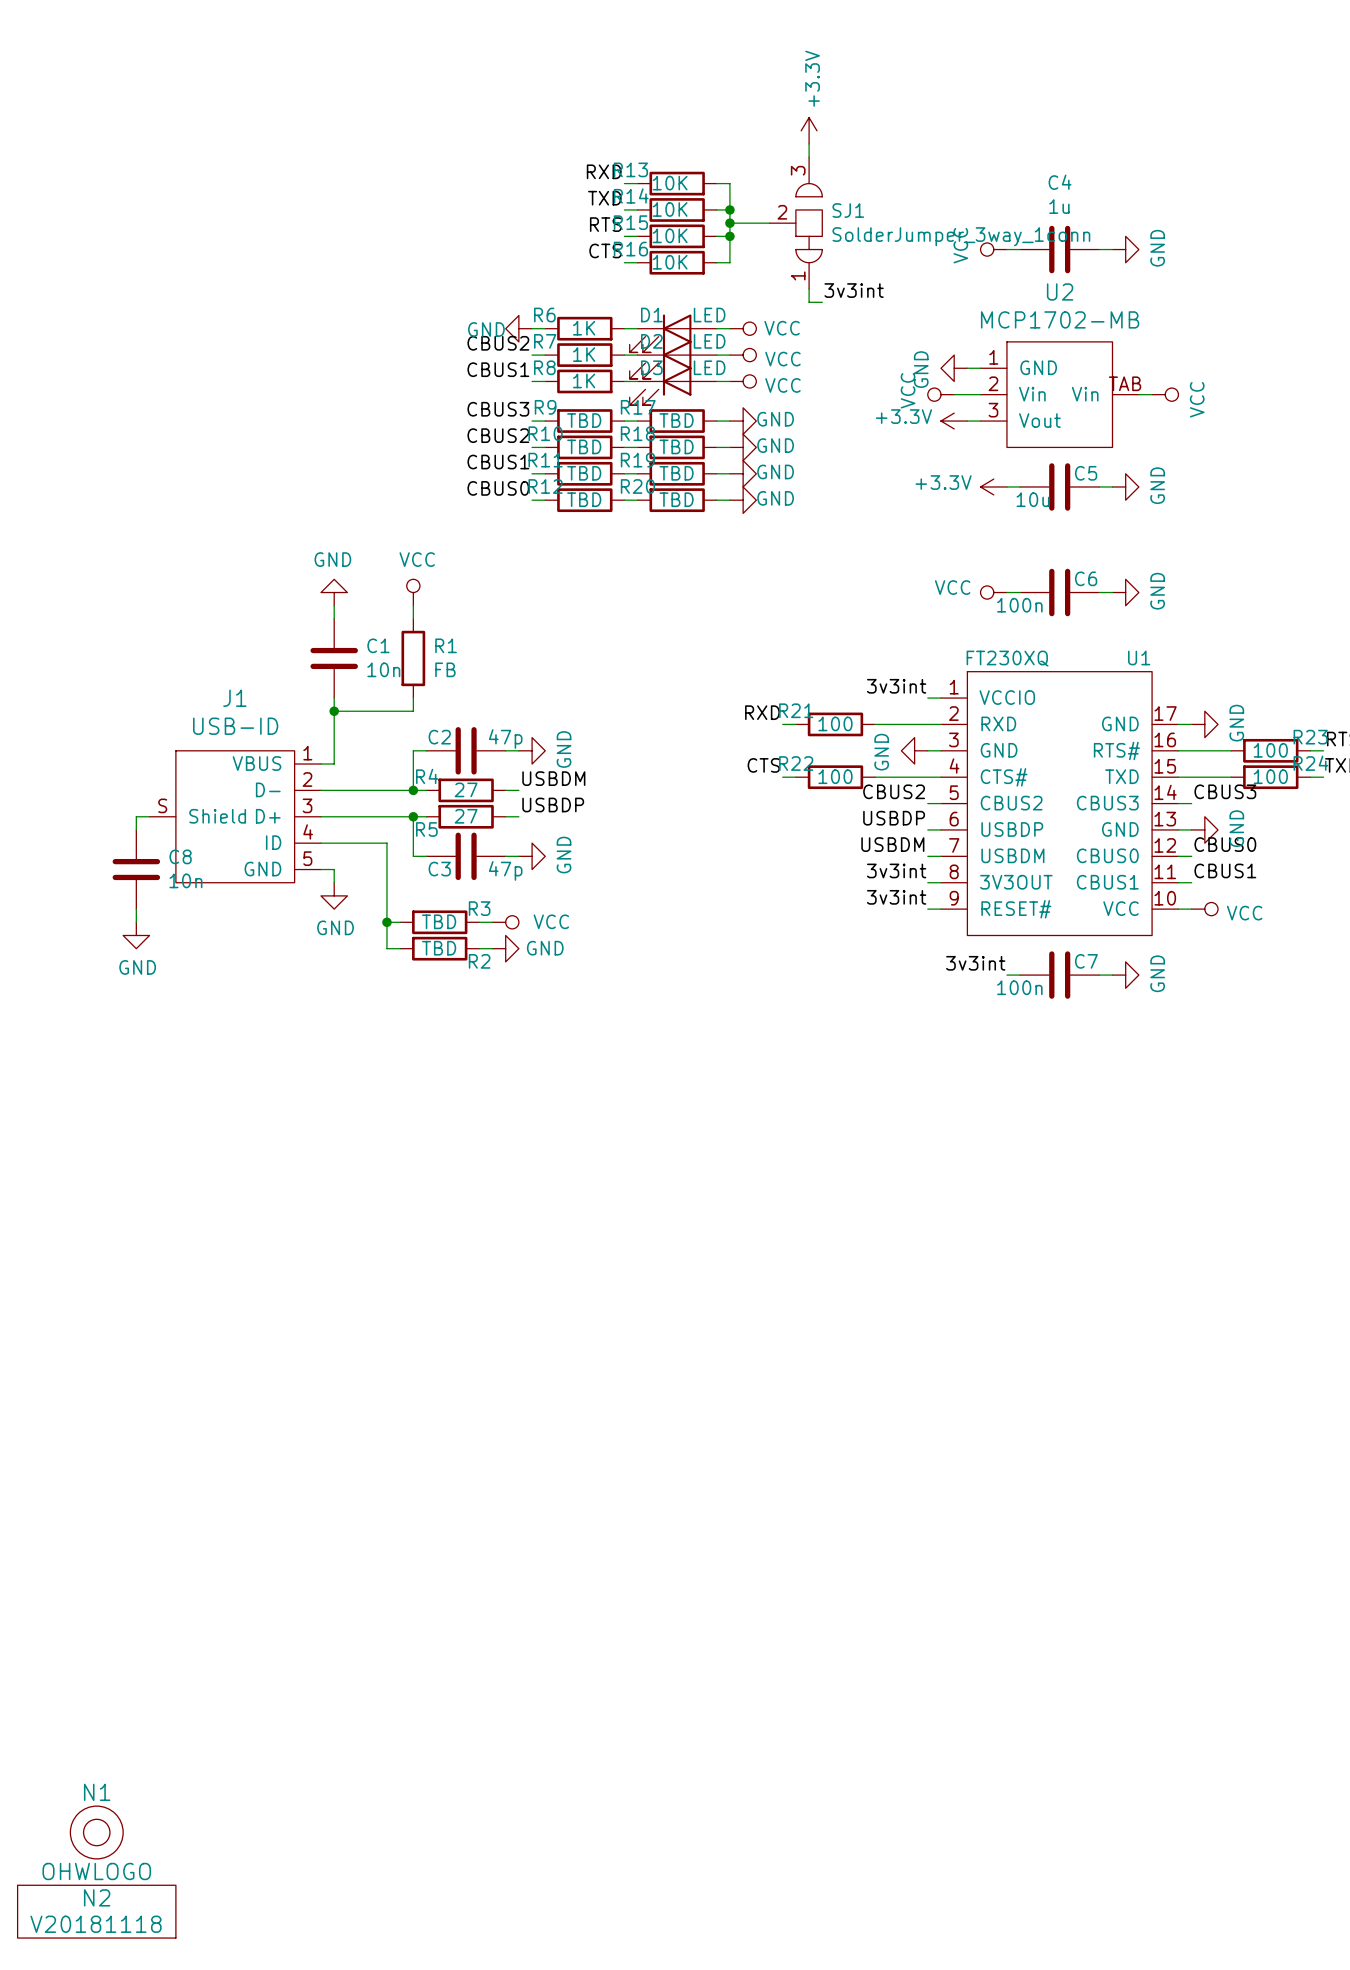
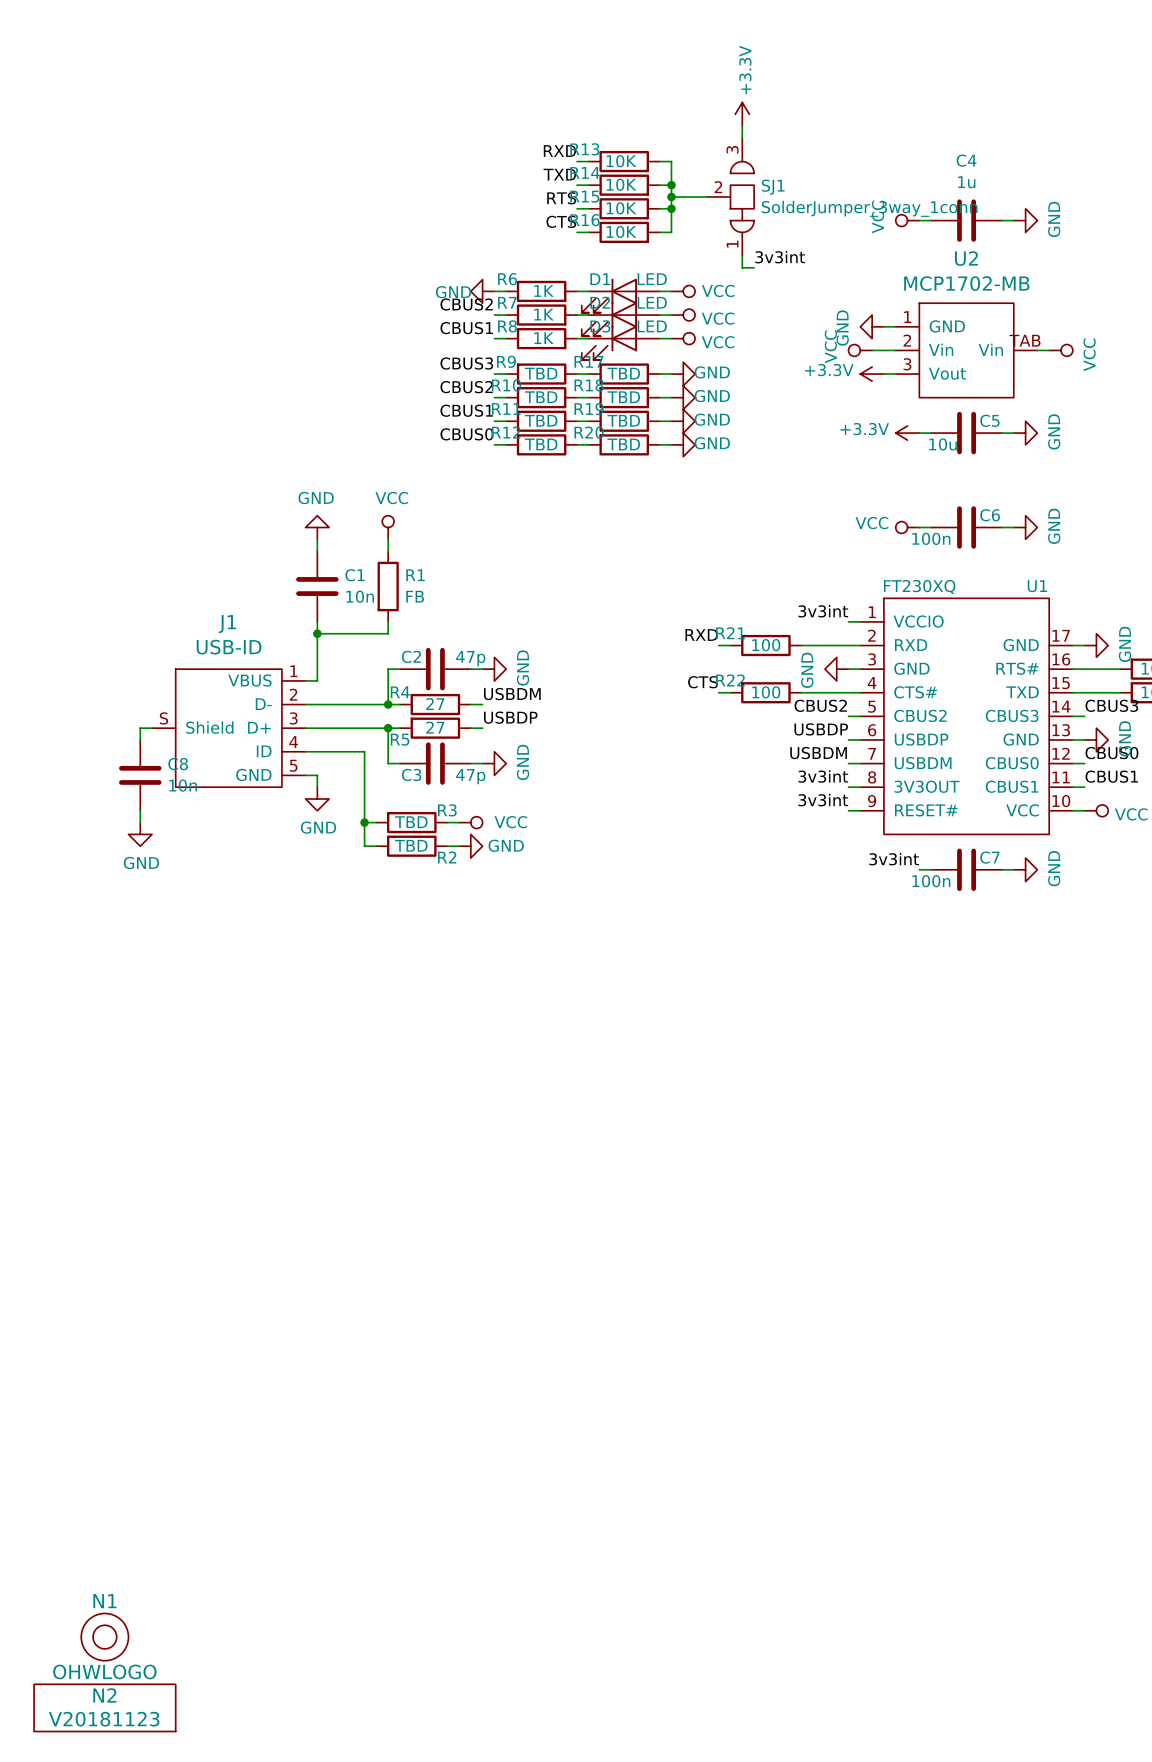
N2 value: V20181118 (96, 1924) -> V20181123 (104, 1719)

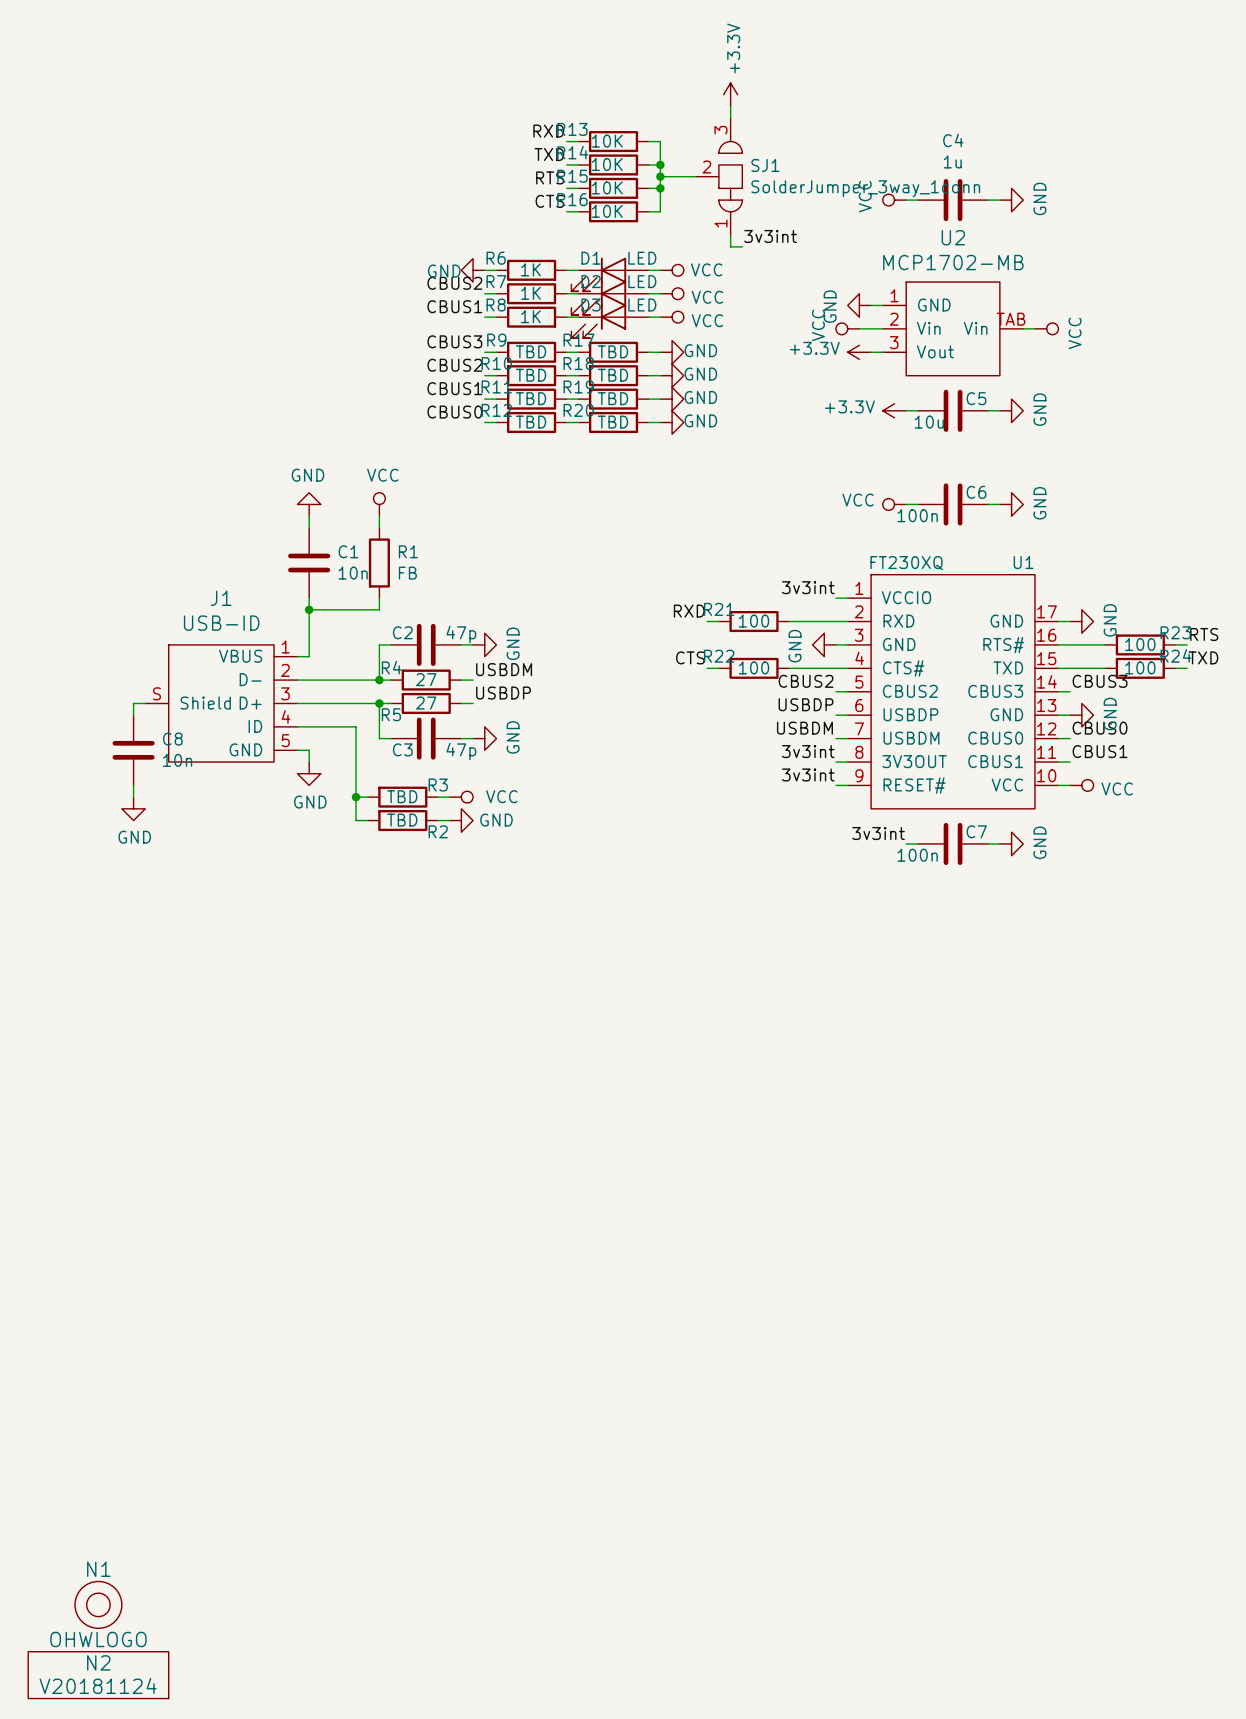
N2 value: V20181123 (104, 1719) -> V20181124 (98, 1685)

